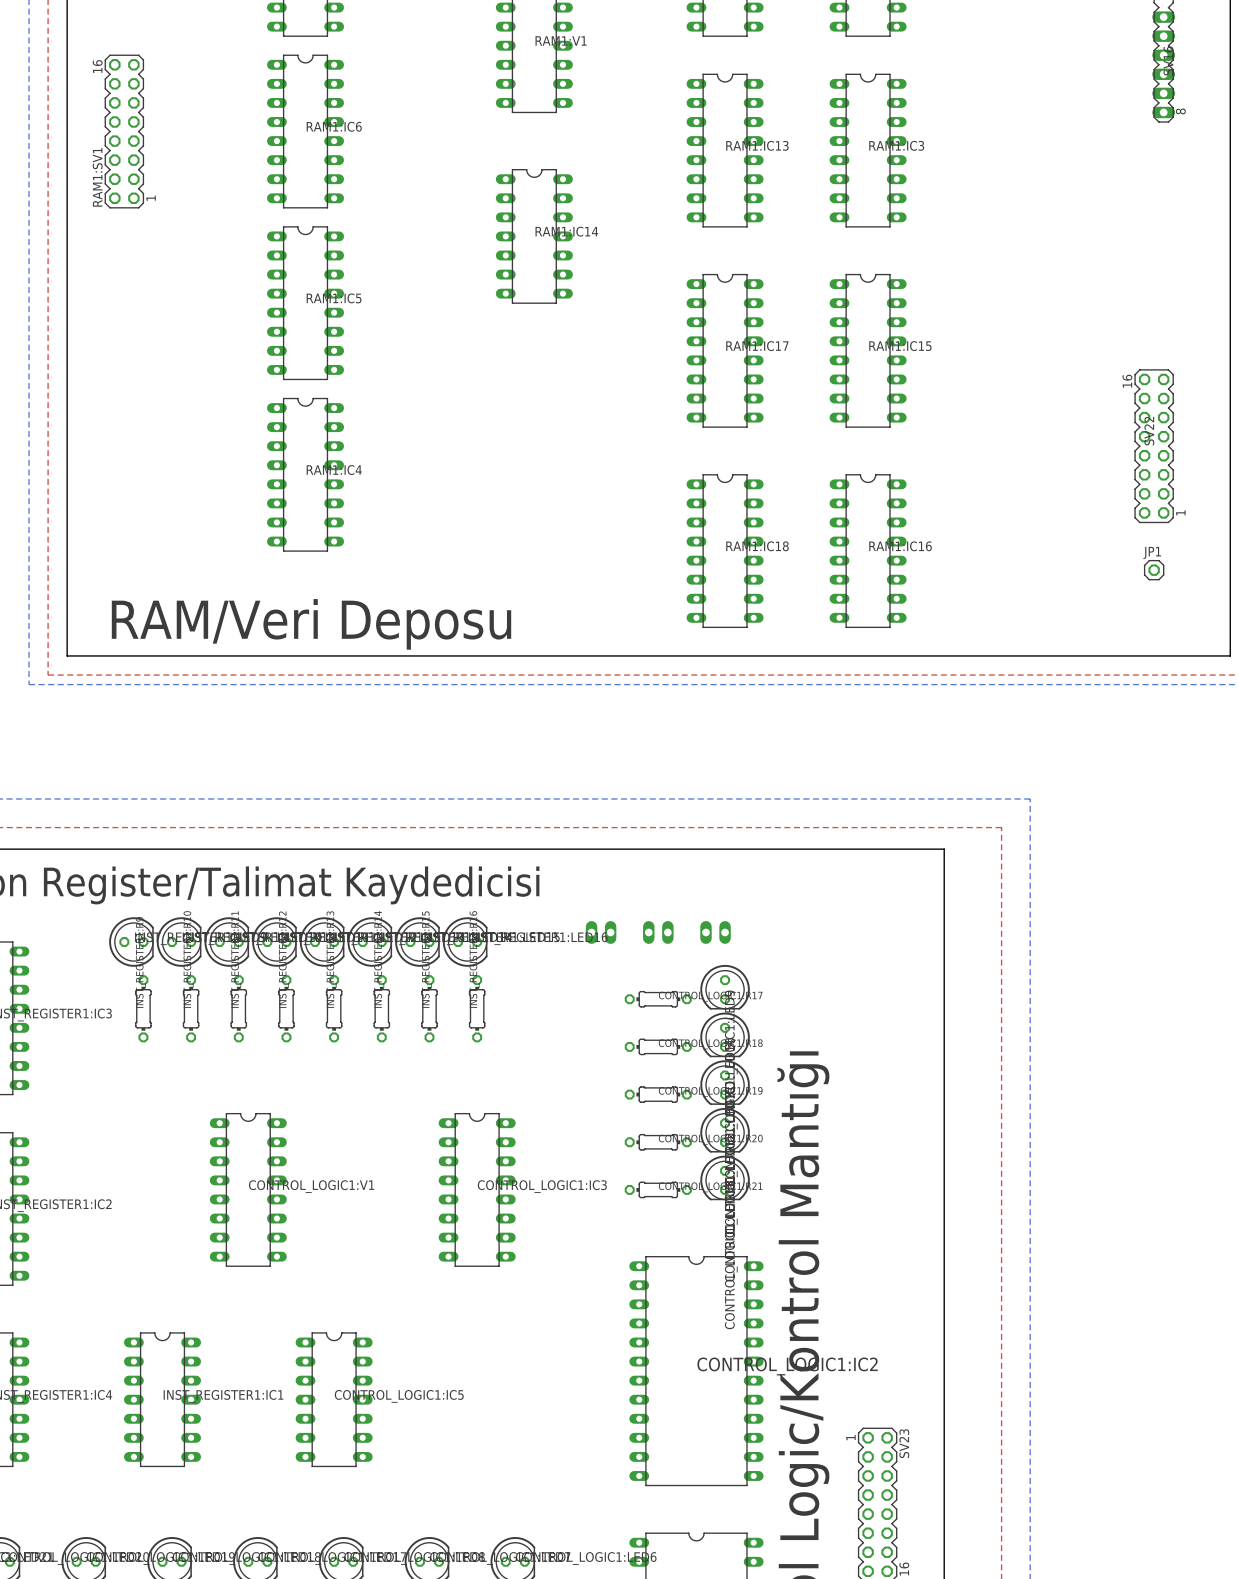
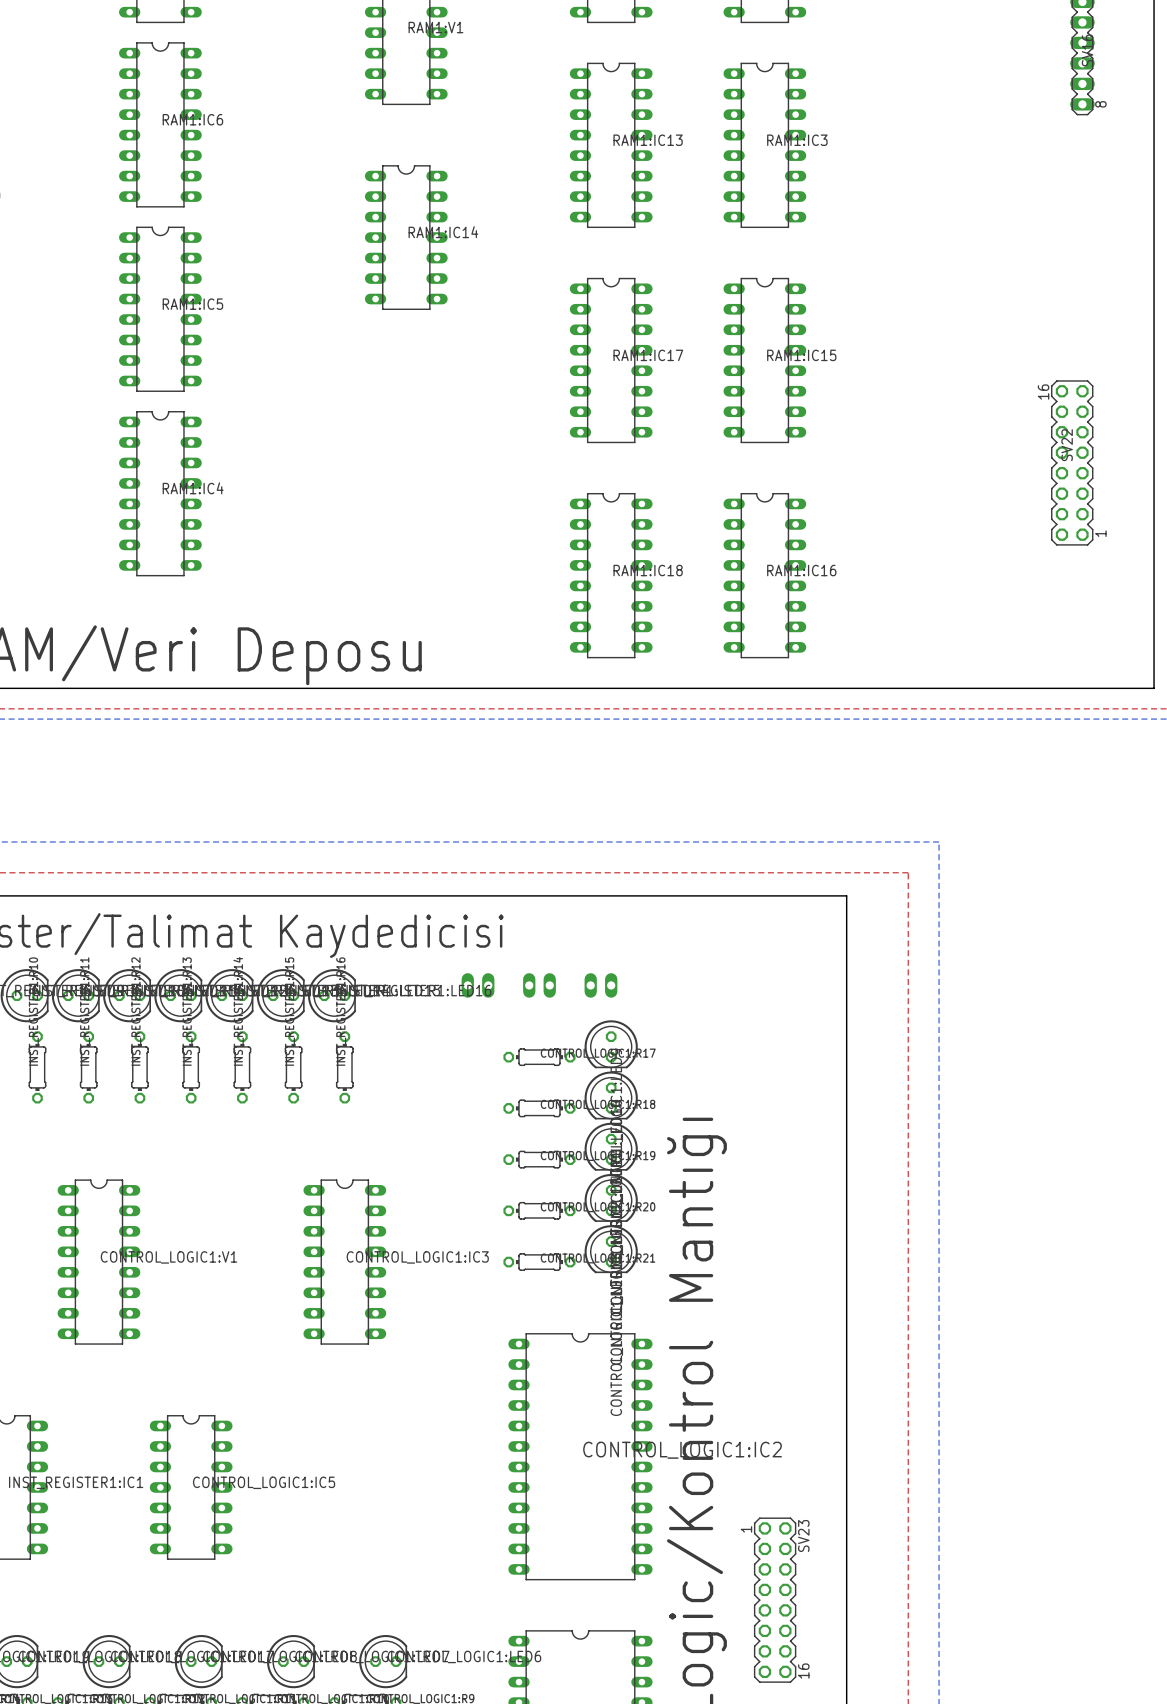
JP1: (1154, 570) -> none

